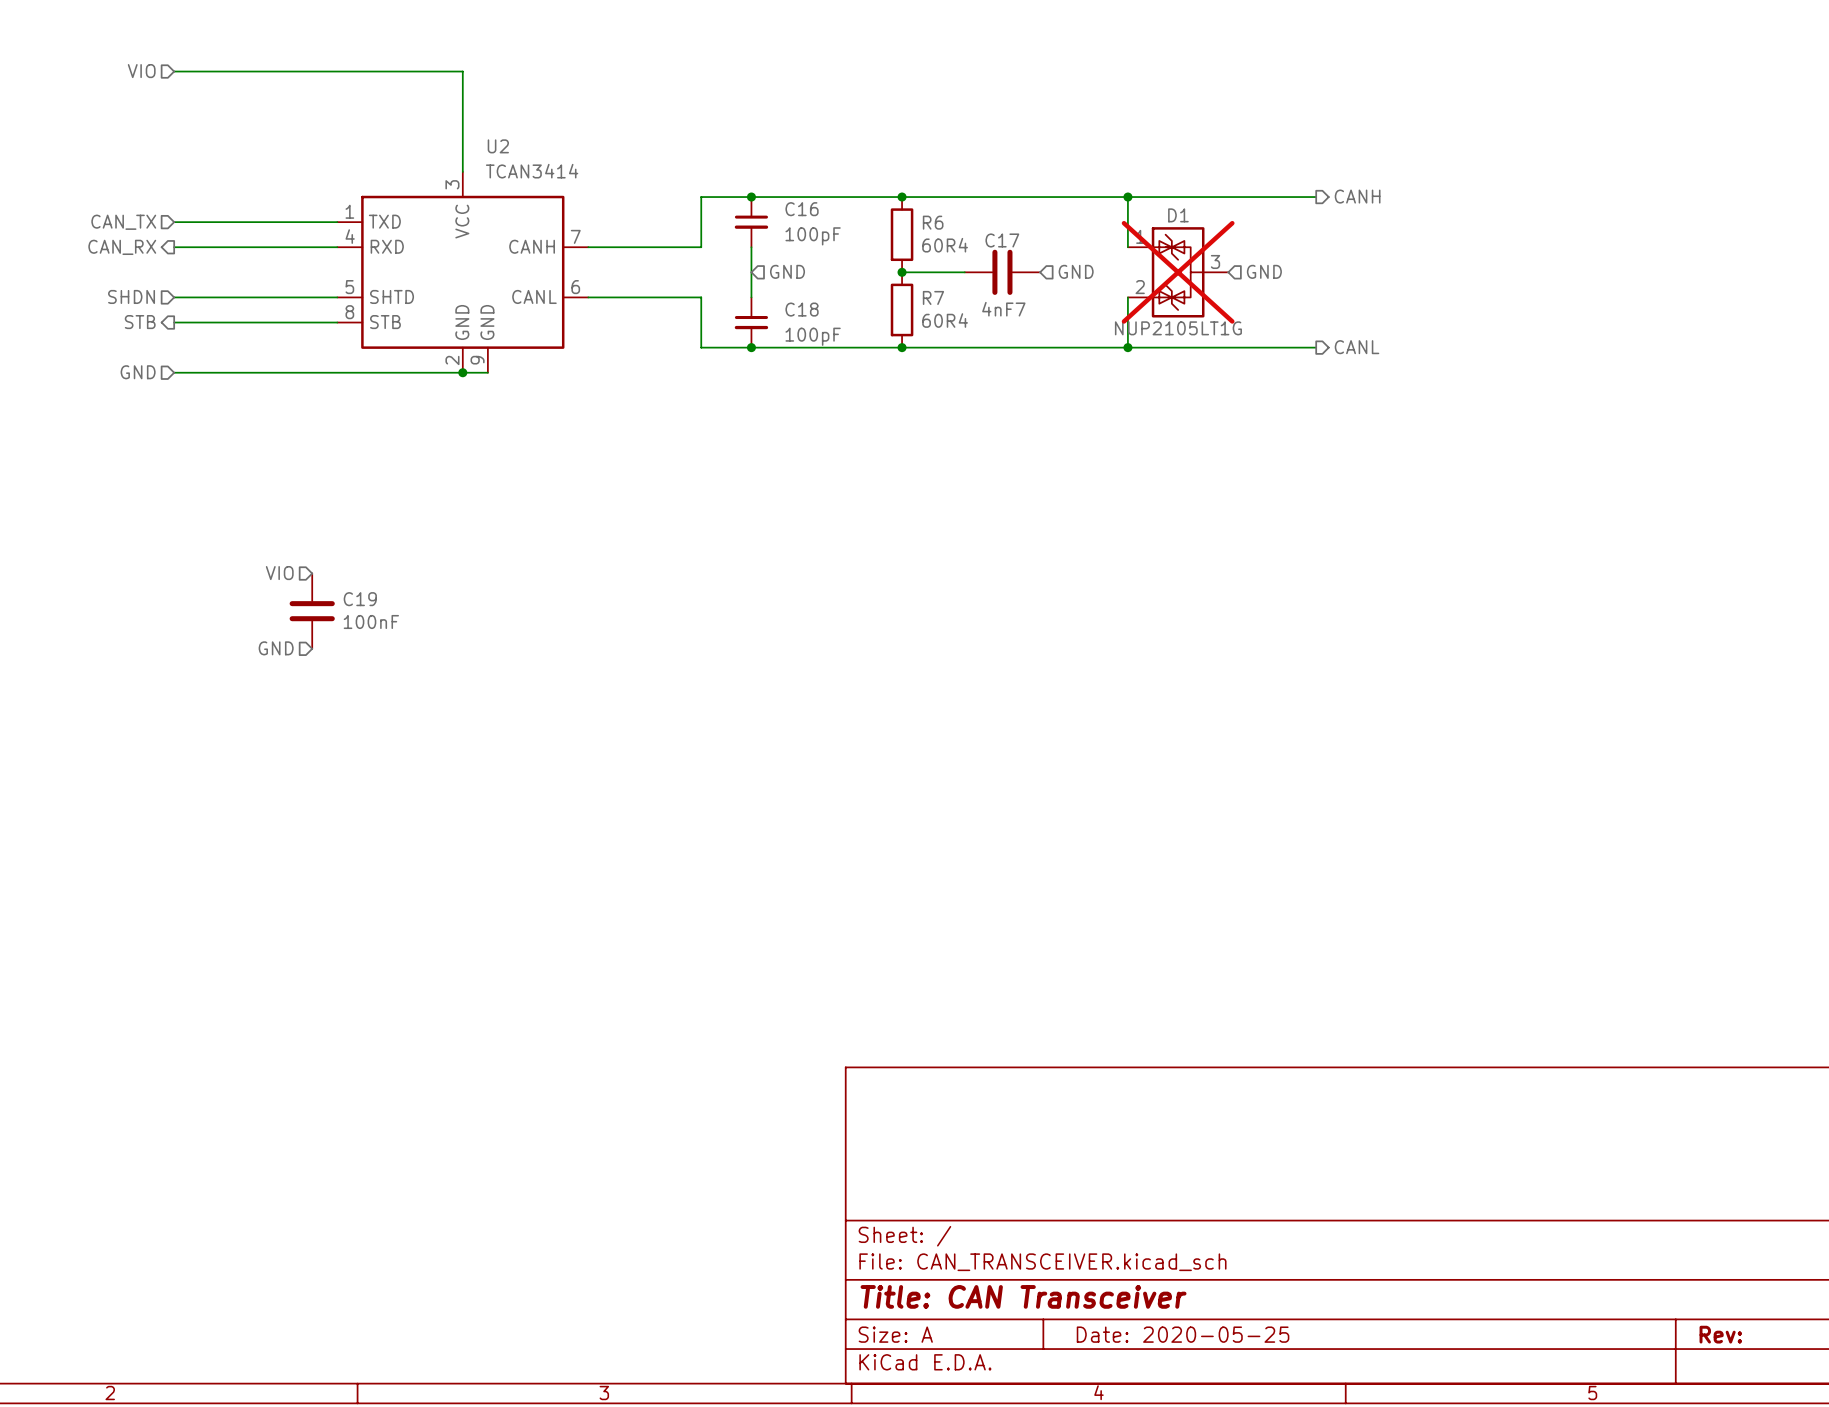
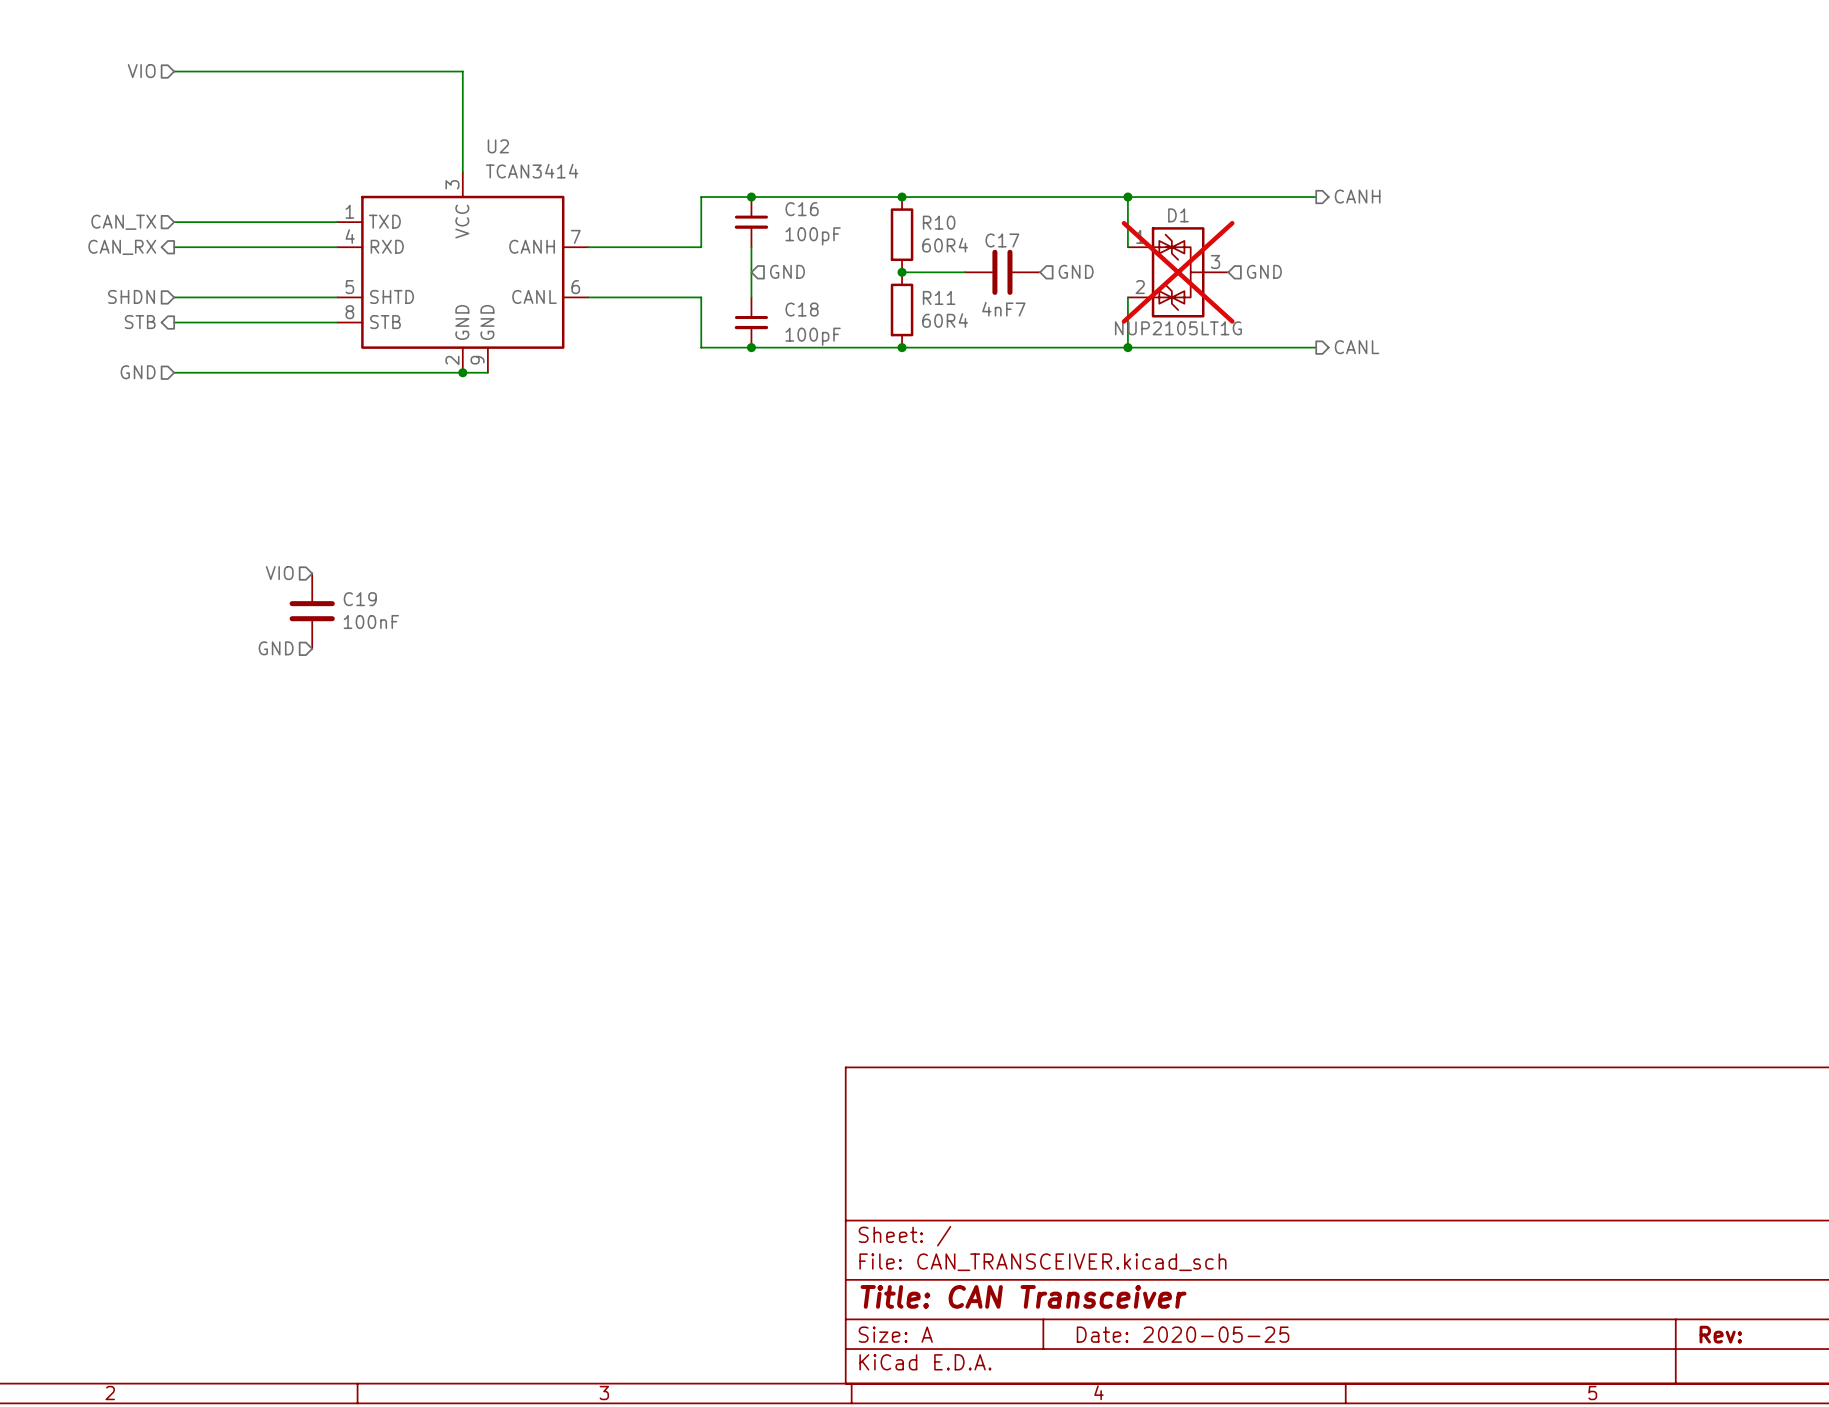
R6 name: R6 (933, 222) -> R10 (939, 222)
R7 name: R7 (933, 297) -> R11 (939, 297)

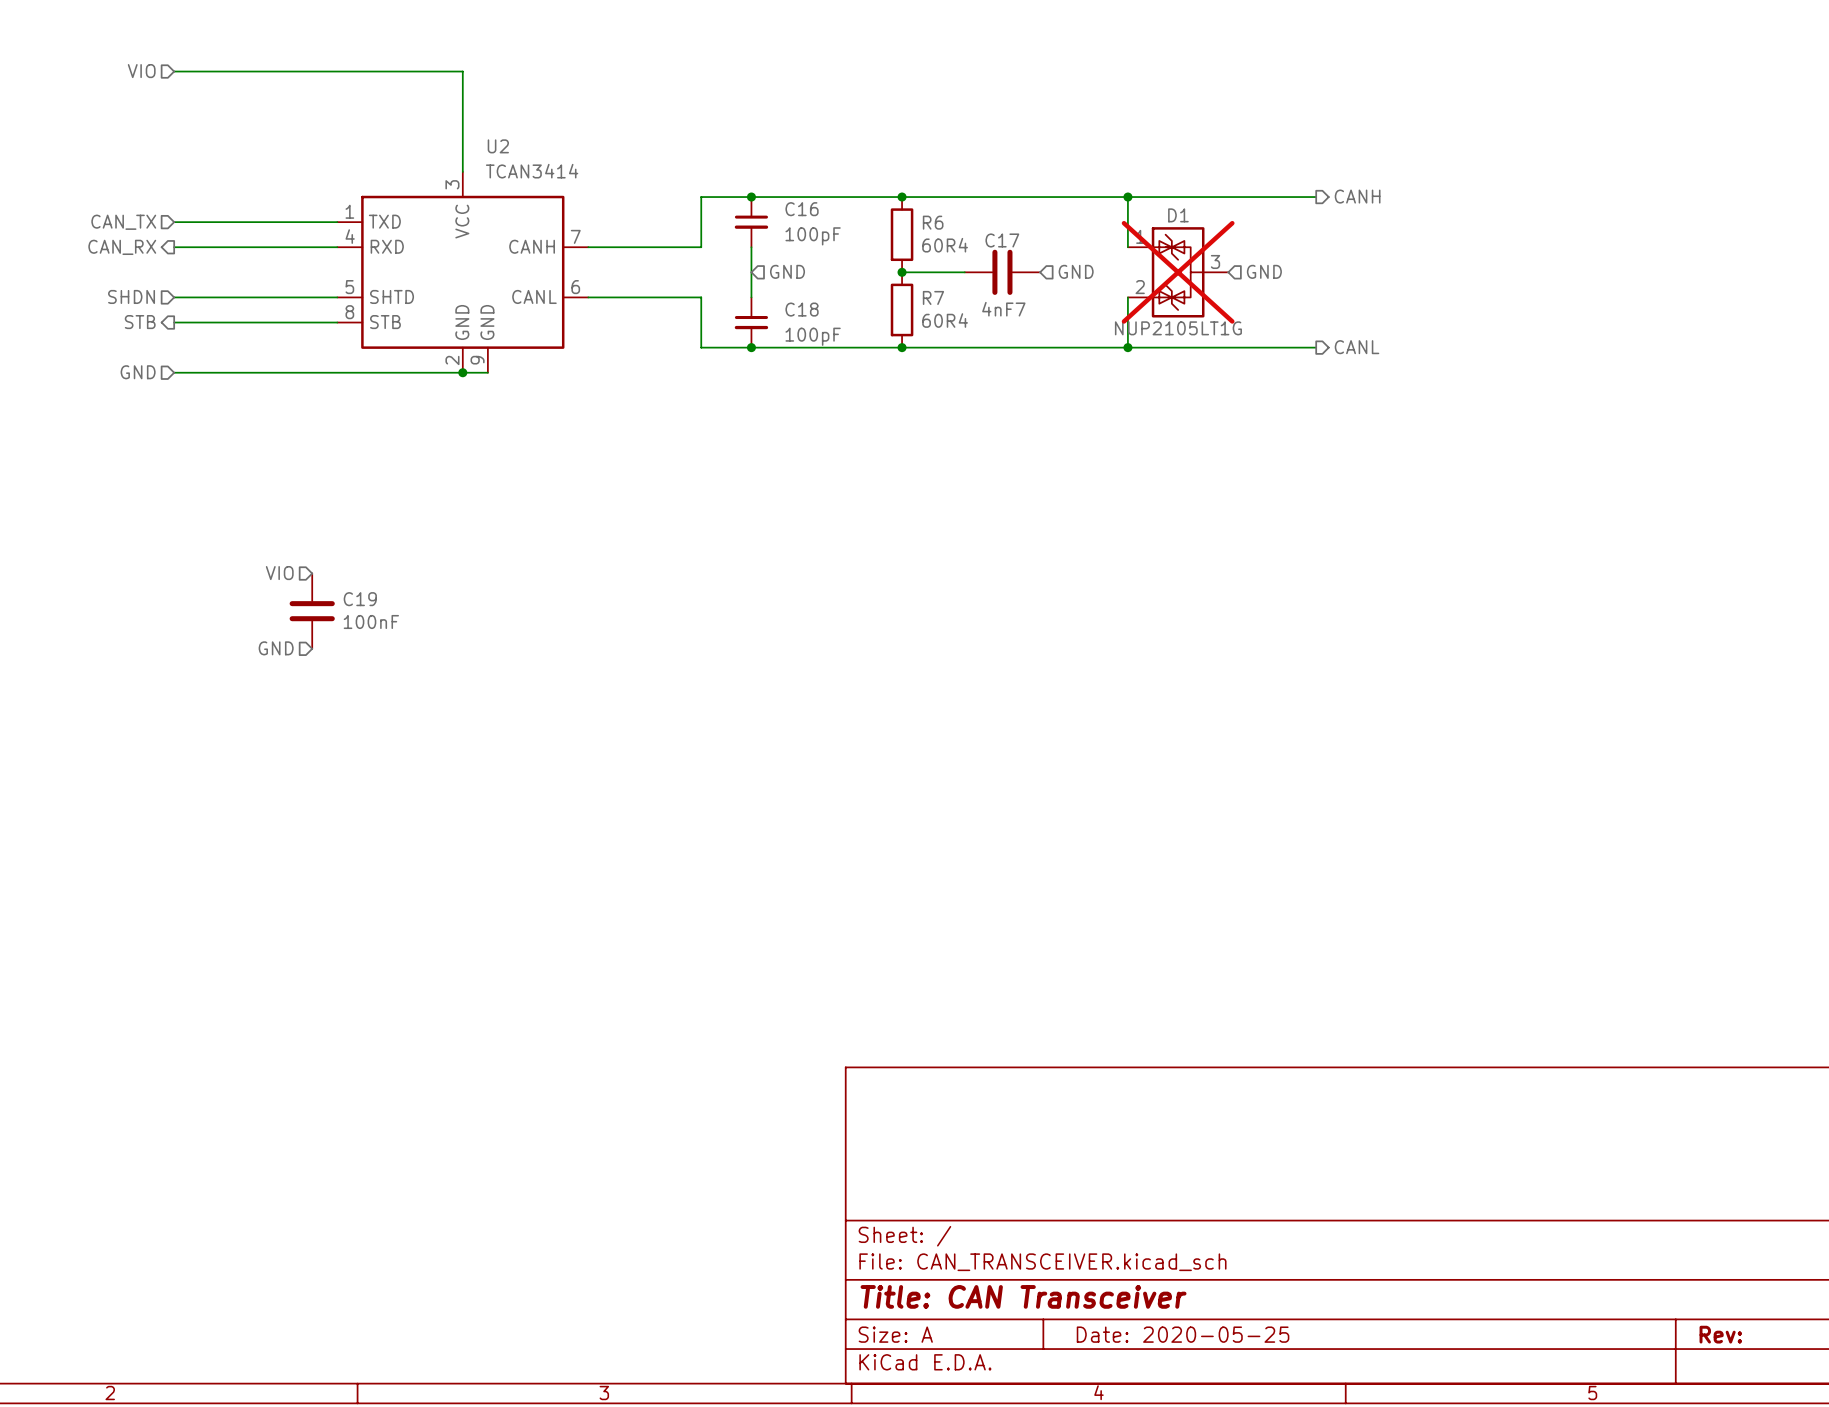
R10 name: R10 (939, 222) -> R6 (933, 222)
R11 name: R11 (939, 297) -> R7 (933, 297)

